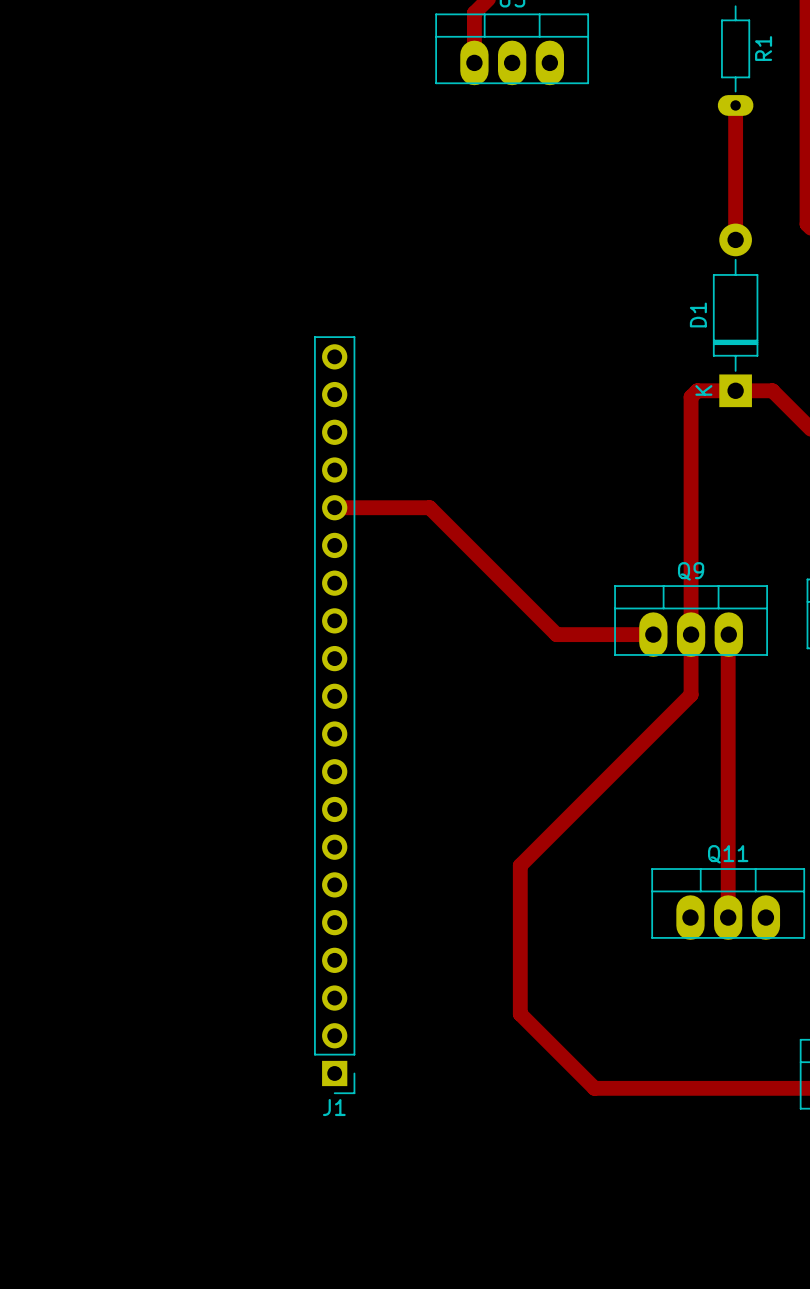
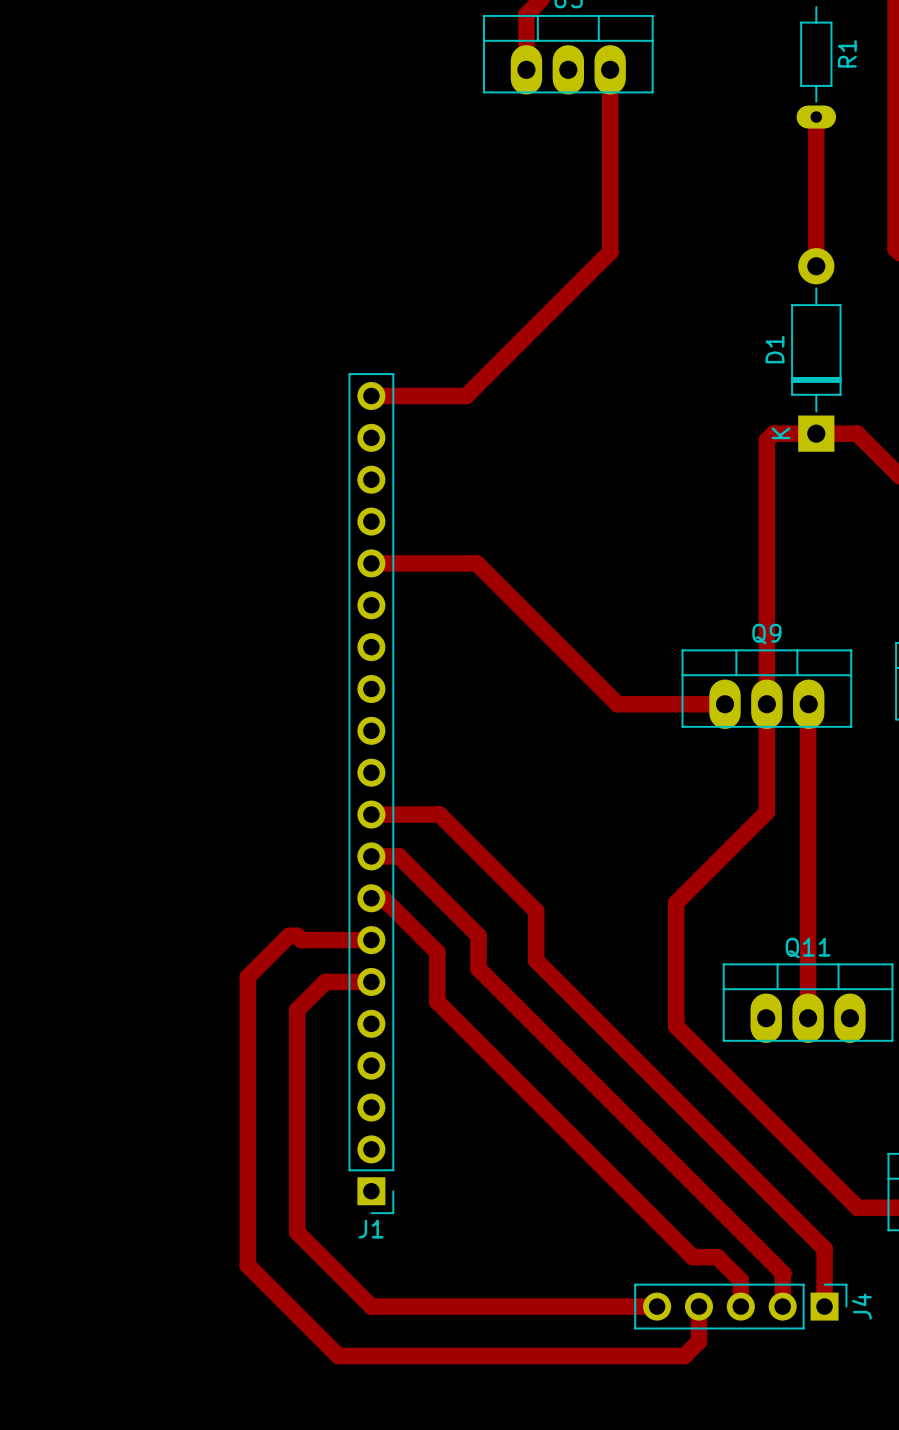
track: none -> (610, 69) (610, 251)
track: none -> (610, 251) (466, 396) (371, 396)
track: (691, 694) (520, 865) (520, 1014) (594, 1088) (772, 1088) -> (766, 771) (766, 812) (676, 902) (676, 1026) (857, 1207)
track: none -> (371, 814) (439, 814) (536, 911) (536, 960) (824, 1248) (824, 1306)
track: none -> (371, 856) (399, 856) (478, 935) (478, 968) (783, 1273) (782, 1306)
track: none -> (371, 898) (383, 898) (437, 952) (437, 1001) (692, 1257) (717, 1257) (740, 1280) (740, 1306)
track: none -> (371, 940) (301, 940) (297, 935) (289, 935) (247, 977) (247, 1265) (338, 1356) (684, 1356) (698, 1341) (698, 1306)
track: none -> (371, 981) (325, 981) (297, 1009) (297, 1232) (371, 1306) (657, 1306)
J4: none -> (740, 1306)

